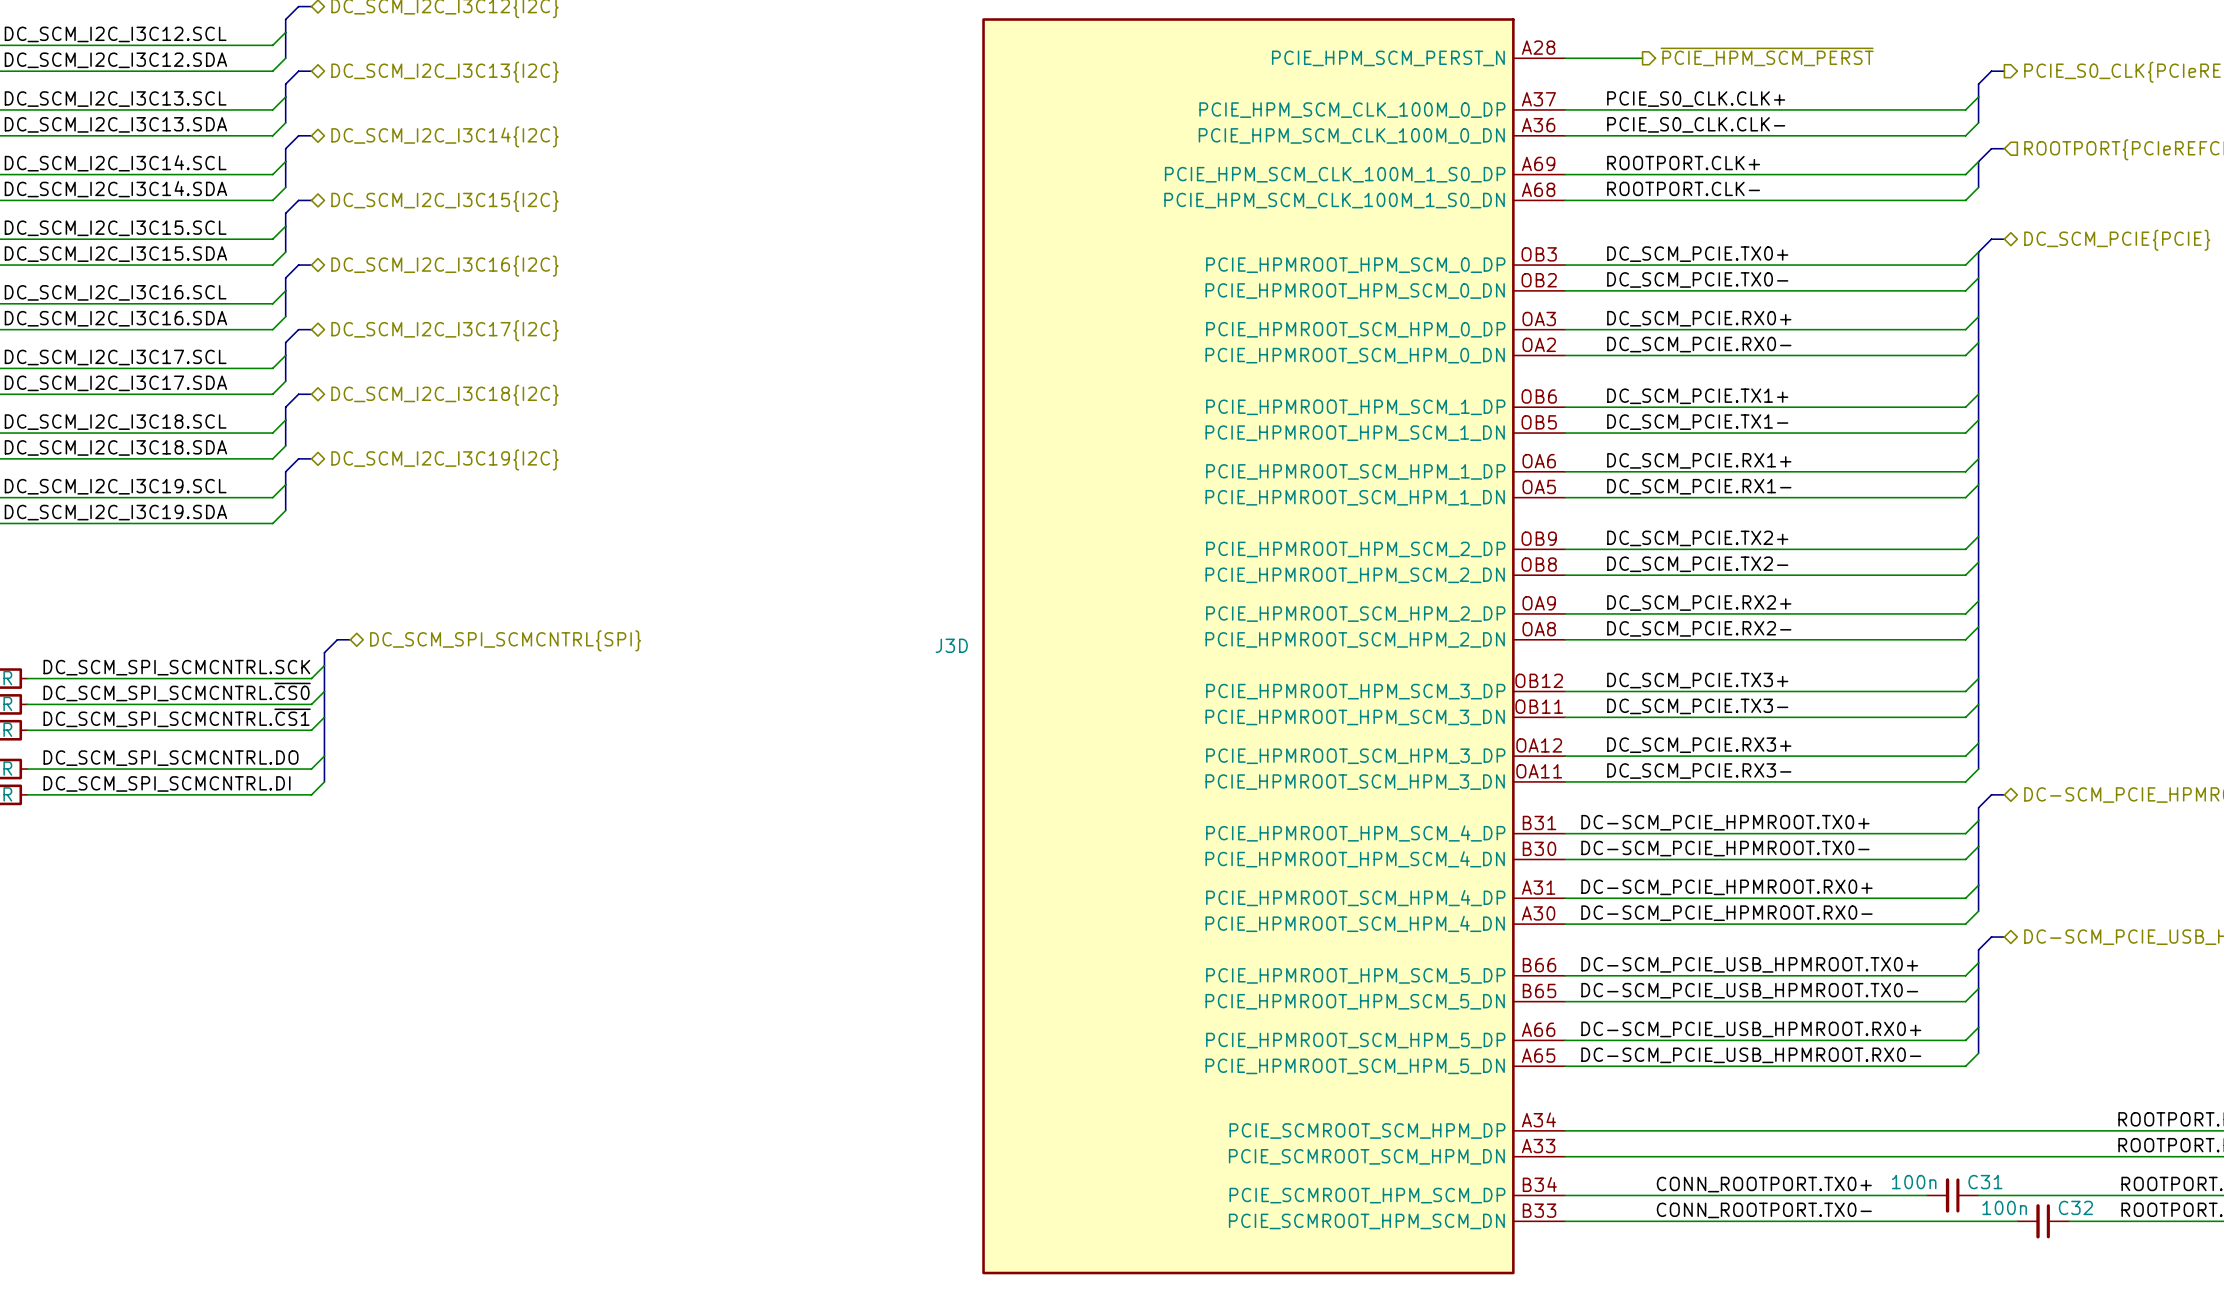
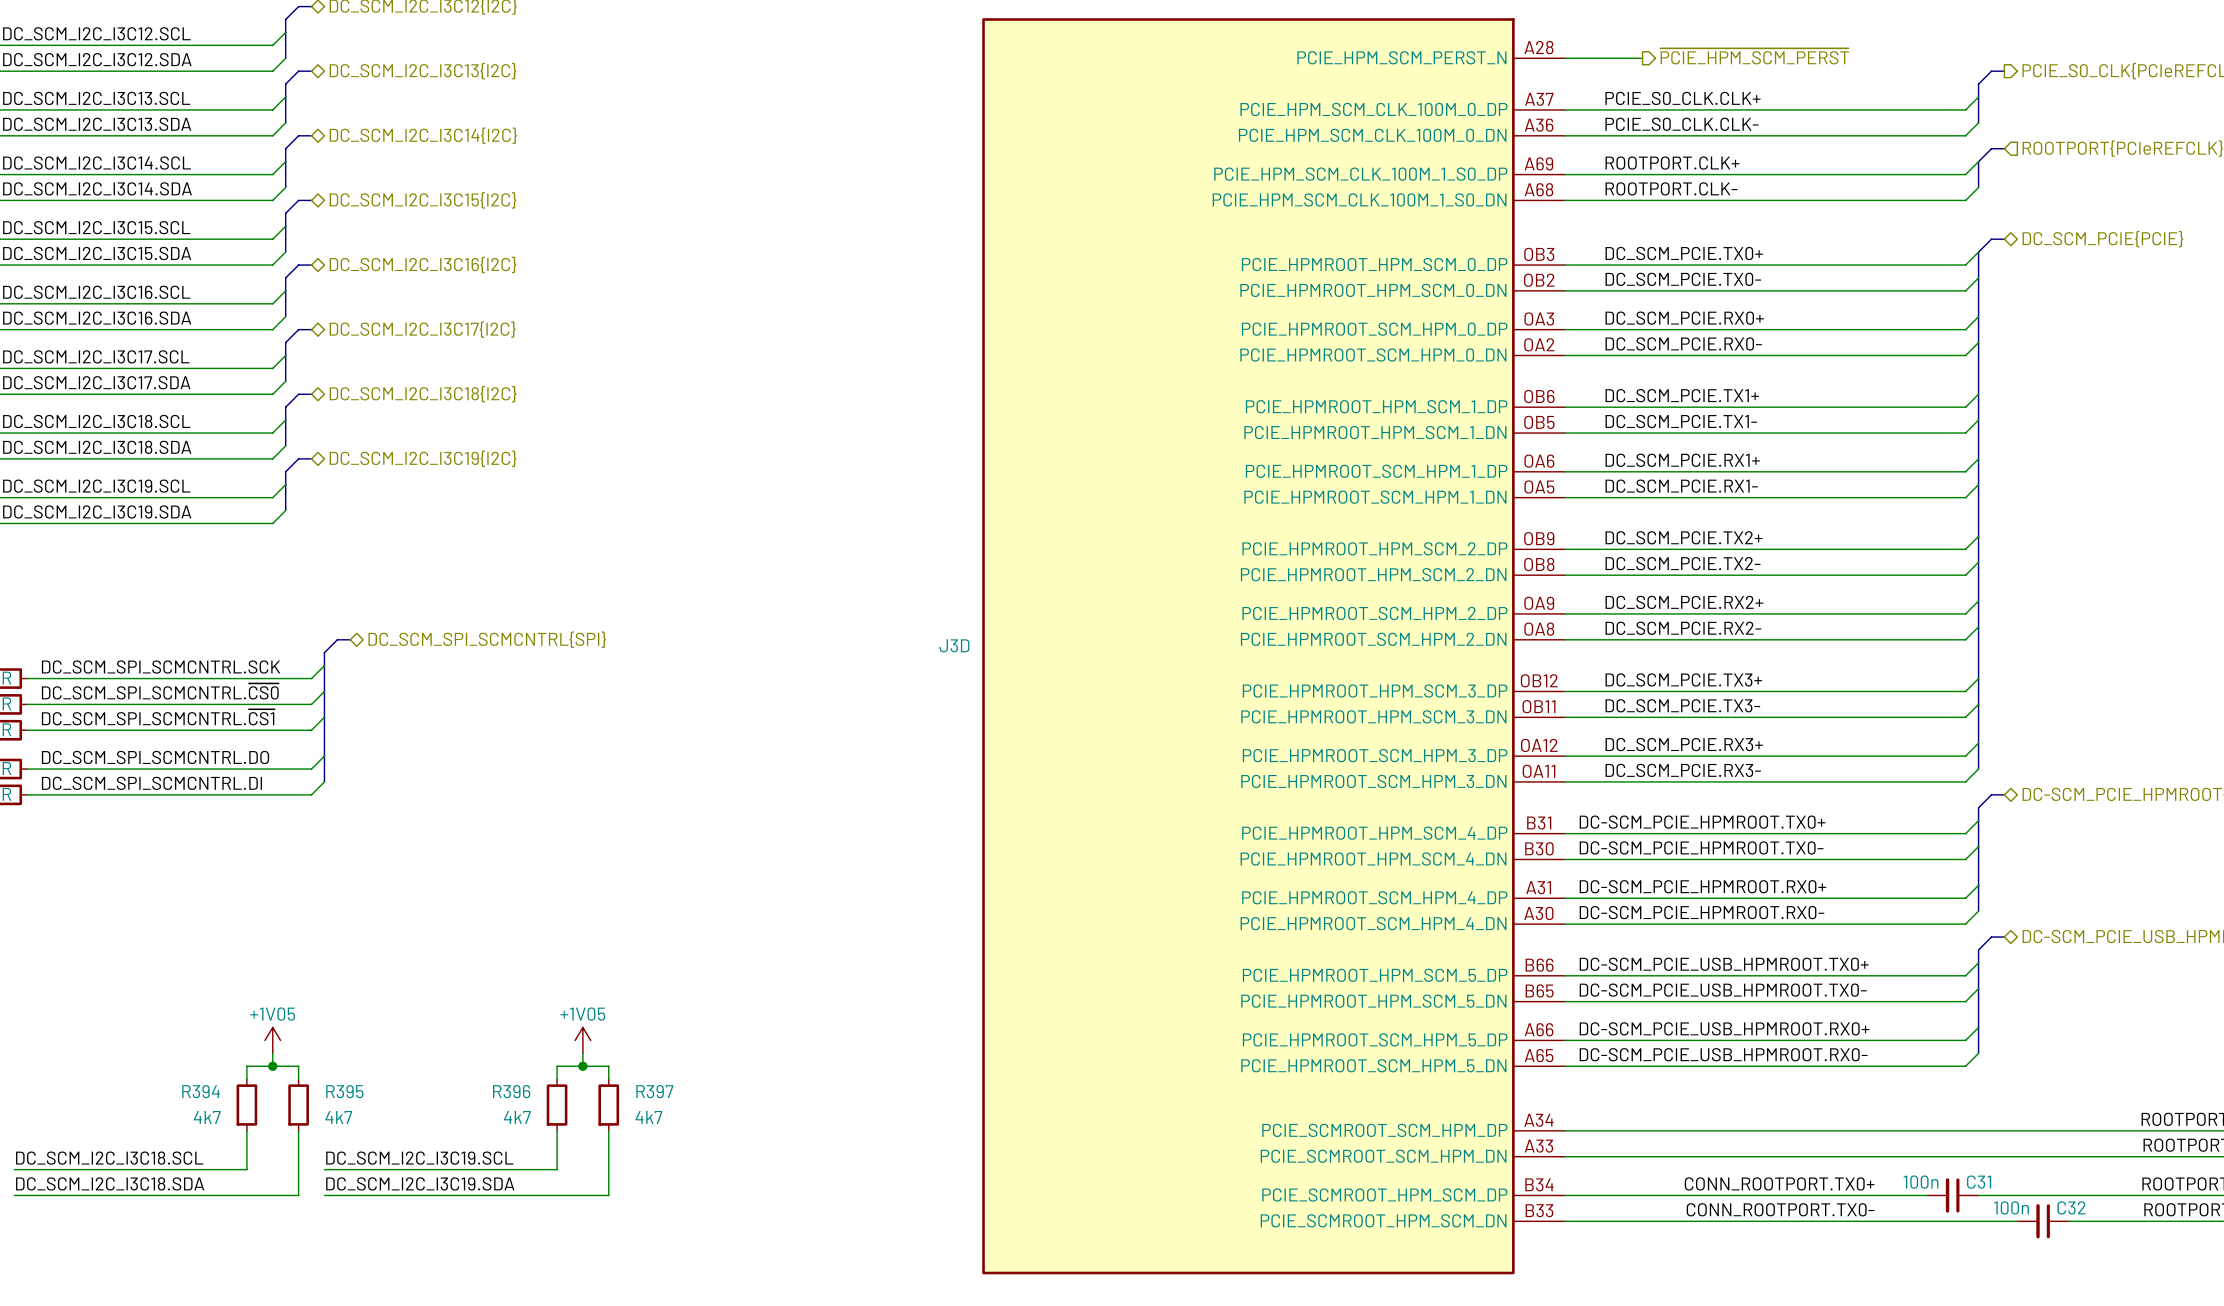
power symbol: none -> +1V05 (272, 1040)
power symbol: none -> +1V05 (582, 1040)
wire: none -> (272, 1053) (272, 1066)
wire: none -> (582, 1053) (582, 1066)
junction: none -> (272, 1066)
junction: none -> (582, 1066)
wire: none -> (246, 1079) (246, 1066) (298, 1066) (298, 1079)
wire: none -> (557, 1079) (557, 1066) (608, 1066) (608, 1079)
R394: none -> (246, 1105)
R395: none -> (298, 1105)
R396: none -> (557, 1105)
R397: none -> (608, 1105)
wire: none -> (246, 1130) (246, 1169) (14, 1169)
wire: none -> (298, 1130) (298, 1195) (14, 1195)
wire: none -> (557, 1130) (557, 1169) (324, 1169)
wire: none -> (608, 1130) (608, 1195) (324, 1195)
label: none -> DC_SCM_I2C_I3C18.SCL (109, 1158)
label: none -> DC_SCM_I2C_I3C19.SCL (419, 1158)
label: none -> DC_SCM_I2C_I3C18.SDA (110, 1183)
label: none -> DC_SCM_I2C_I3C19.SDA (420, 1183)

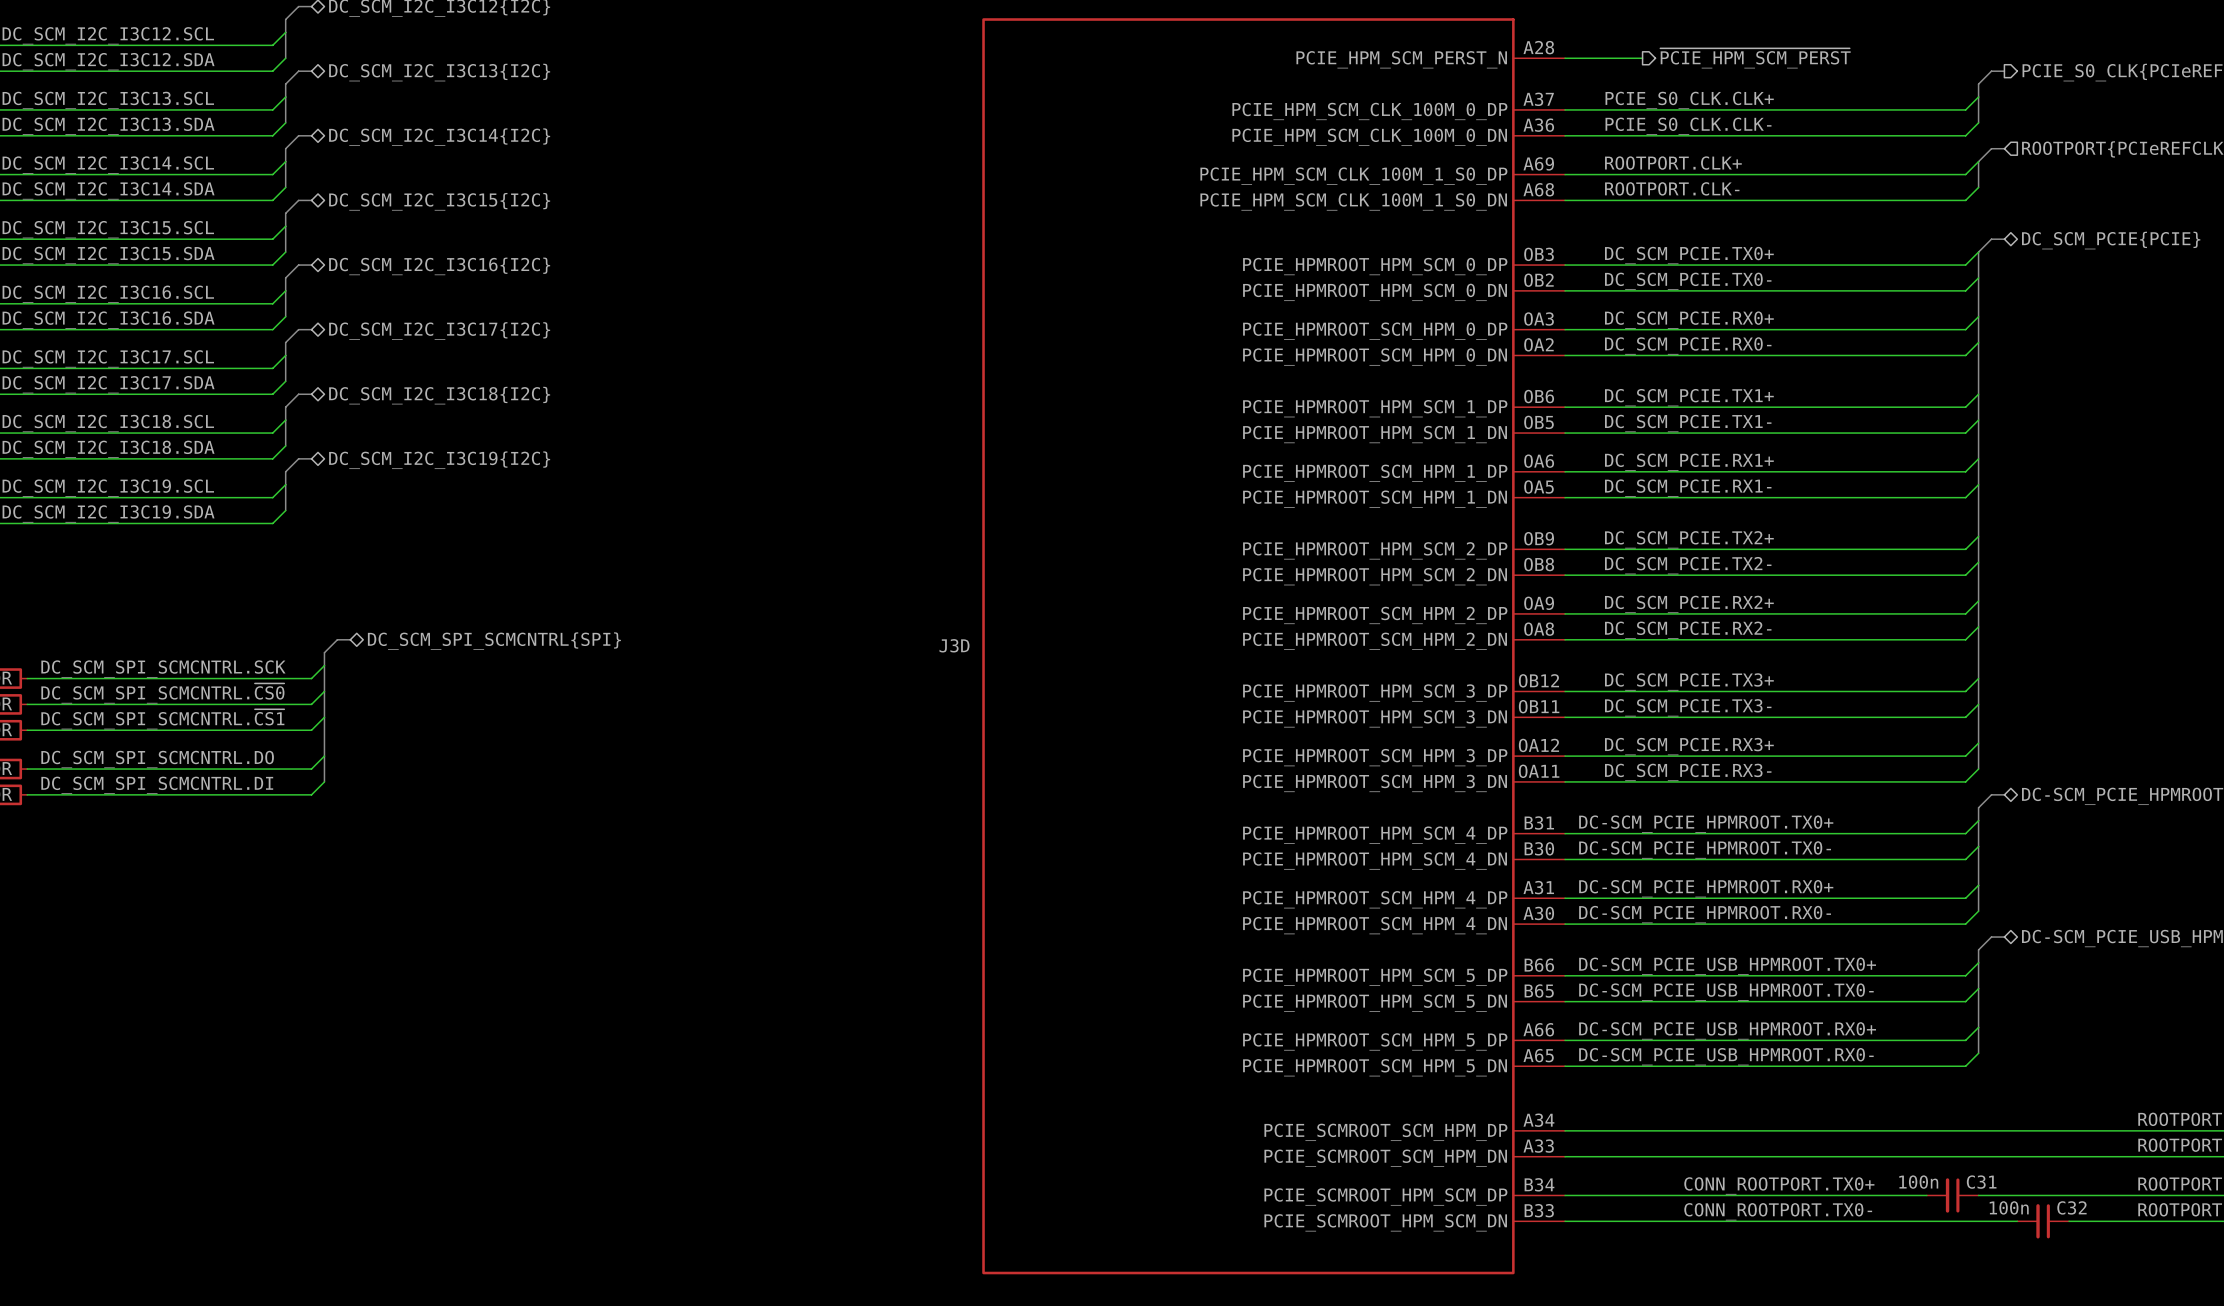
power symbol: +1V05 (272, 1040) -> none
power symbol: +1V05 (582, 1040) -> none
wire: (272, 1053) (272, 1066) -> none
wire: (582, 1053) (582, 1066) -> none
junction: (272, 1066) -> none
junction: (582, 1066) -> none
wire: (246, 1079) (246, 1066) (298, 1066) (298, 1079) -> none
wire: (557, 1079) (557, 1066) (608, 1066) (608, 1079) -> none
R394: (246, 1105) -> none
R395: (298, 1105) -> none
R396: (557, 1105) -> none
R397: (608, 1105) -> none
wire: (246, 1130) (246, 1169) (14, 1169) -> none
wire: (298, 1130) (298, 1195) (14, 1195) -> none
wire: (557, 1130) (557, 1169) (324, 1169) -> none
wire: (608, 1130) (608, 1195) (324, 1195) -> none
label: DC_SCM_I2C_I3C18.SCL (109, 1158) -> none
label: DC_SCM_I2C_I3C19.SCL (419, 1158) -> none
label: DC_SCM_I2C_I3C18.SDA (110, 1183) -> none
label: DC_SCM_I2C_I3C19.SDA (420, 1183) -> none

